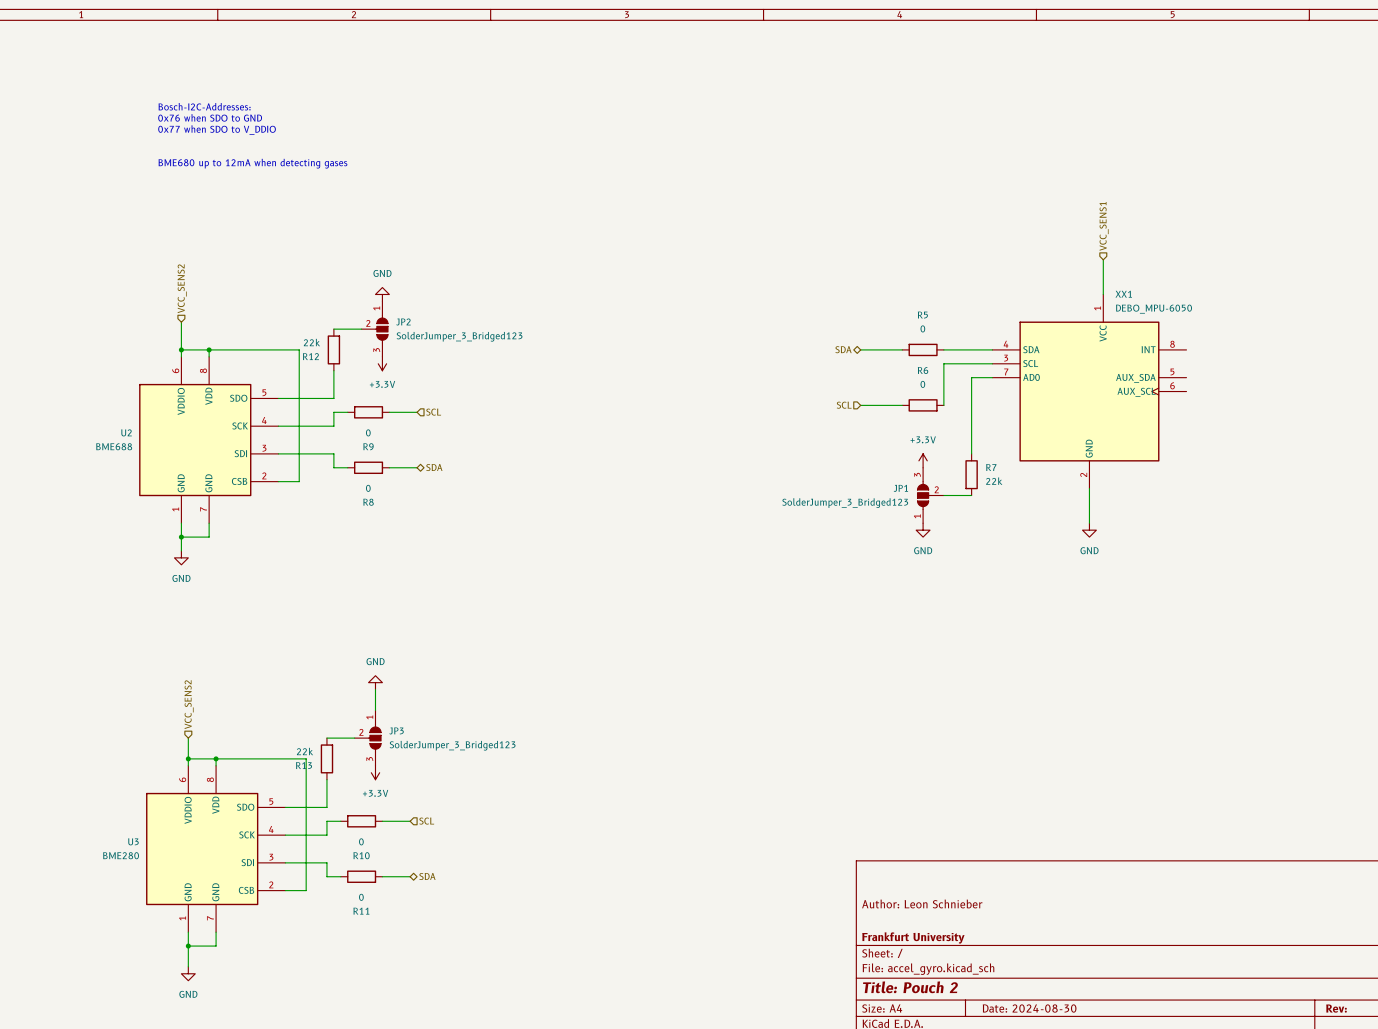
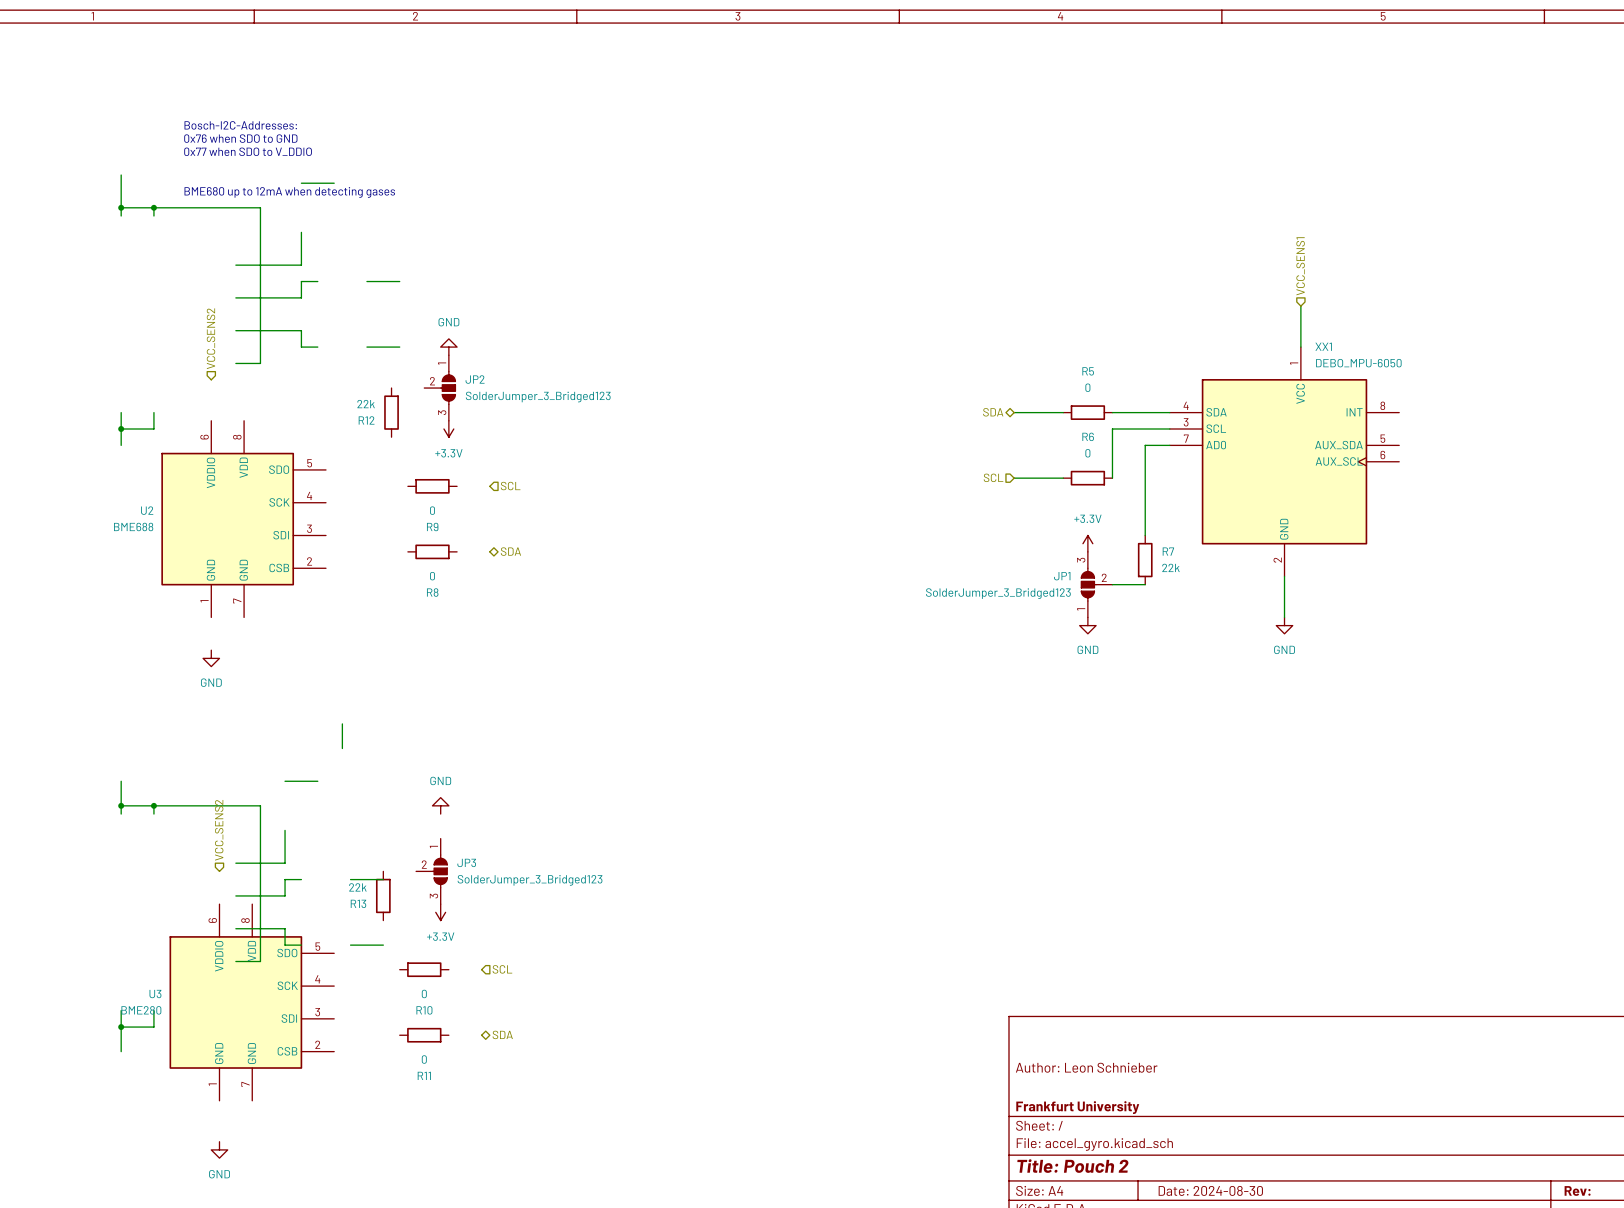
wire: none -> (121, 175) (121, 215)
wire: none -> (301, 183) (334, 183)
wire: none -> (121, 207) (260, 207) (260, 363) (235, 363)
junction: none -> (121, 207)
wire: none -> (153, 207) (153, 215)
junction: none -> (153, 207)
wire: none -> (301, 232) (301, 265) (235, 265)
wire: none -> (317, 281) (301, 281) (301, 297) (235, 297)
wire: none -> (366, 281) (399, 281)
wire: none -> (235, 330) (301, 330) (301, 347) (317, 347)
wire: (181, 322) (181, 356) -> none
wire: (333, 329) (361, 329) -> (366, 347) (399, 347)
wire: none -> (121, 412) (121, 445)
wire: none -> (153, 412) (153, 428) (121, 428)
wire: (181, 349) (299, 349) (299, 481) (278, 481) -> none
junction: (181, 349) -> none
wire: (209, 349) (209, 356) -> none
junction: (209, 349) -> none
junction: none -> (121, 428)
wire: (333, 370) (333, 398) (278, 398) -> none
wire: (347, 412) (333, 412) (333, 426) (278, 426) -> none
wire: (389, 412) (417, 412) -> none
wire: (278, 453) (333, 453) (333, 467) (347, 467) -> none
wire: (389, 467) (417, 467) -> none
wire: (181, 523) (181, 550) -> none
wire: (209, 523) (209, 537) (181, 537) -> none
junction: (181, 537) -> none
wire: none -> (121, 805) (260, 805) (260, 961) (235, 961)
junction: none -> (121, 805)
junction: none -> (153, 805)
wire: (375, 689) (375, 710) -> (342, 723) (342, 748)
wire: (188, 738) (188, 765) -> (121, 781) (121, 814)
wire: (326, 738) (354, 738) -> (285, 781) (317, 781)
wire: (188, 758) (202, 758) -> none
junction: (188, 758) -> none
wire: (216, 758) (216, 765) -> (153, 805) (153, 814)
junction: (216, 758) -> none
wire: (243, 758) (306, 758) (306, 890) (285, 890) -> (285, 895) (285, 879) (301, 879)
wire: (326, 779) (326, 807) (285, 807) -> (285, 830) (285, 863) (235, 863)
wire: (340, 821) (326, 821) (326, 835) (285, 835) -> none
wire: (382, 821) (410, 821) -> (350, 879) (383, 879)
wire: (285, 862) (326, 862) (326, 876) (340, 876) -> (235, 928) (285, 928) (285, 945) (301, 945)
junction: none -> (121, 1027)
wire: (382, 876) (410, 876) -> (350, 945) (383, 945)
wire: (188, 932) (188, 966) -> (121, 1010) (121, 1051)
wire: (216, 932) (216, 946) (188, 946) -> (153, 1010) (153, 1027) (121, 1027)
junction: (188, 946) -> none

